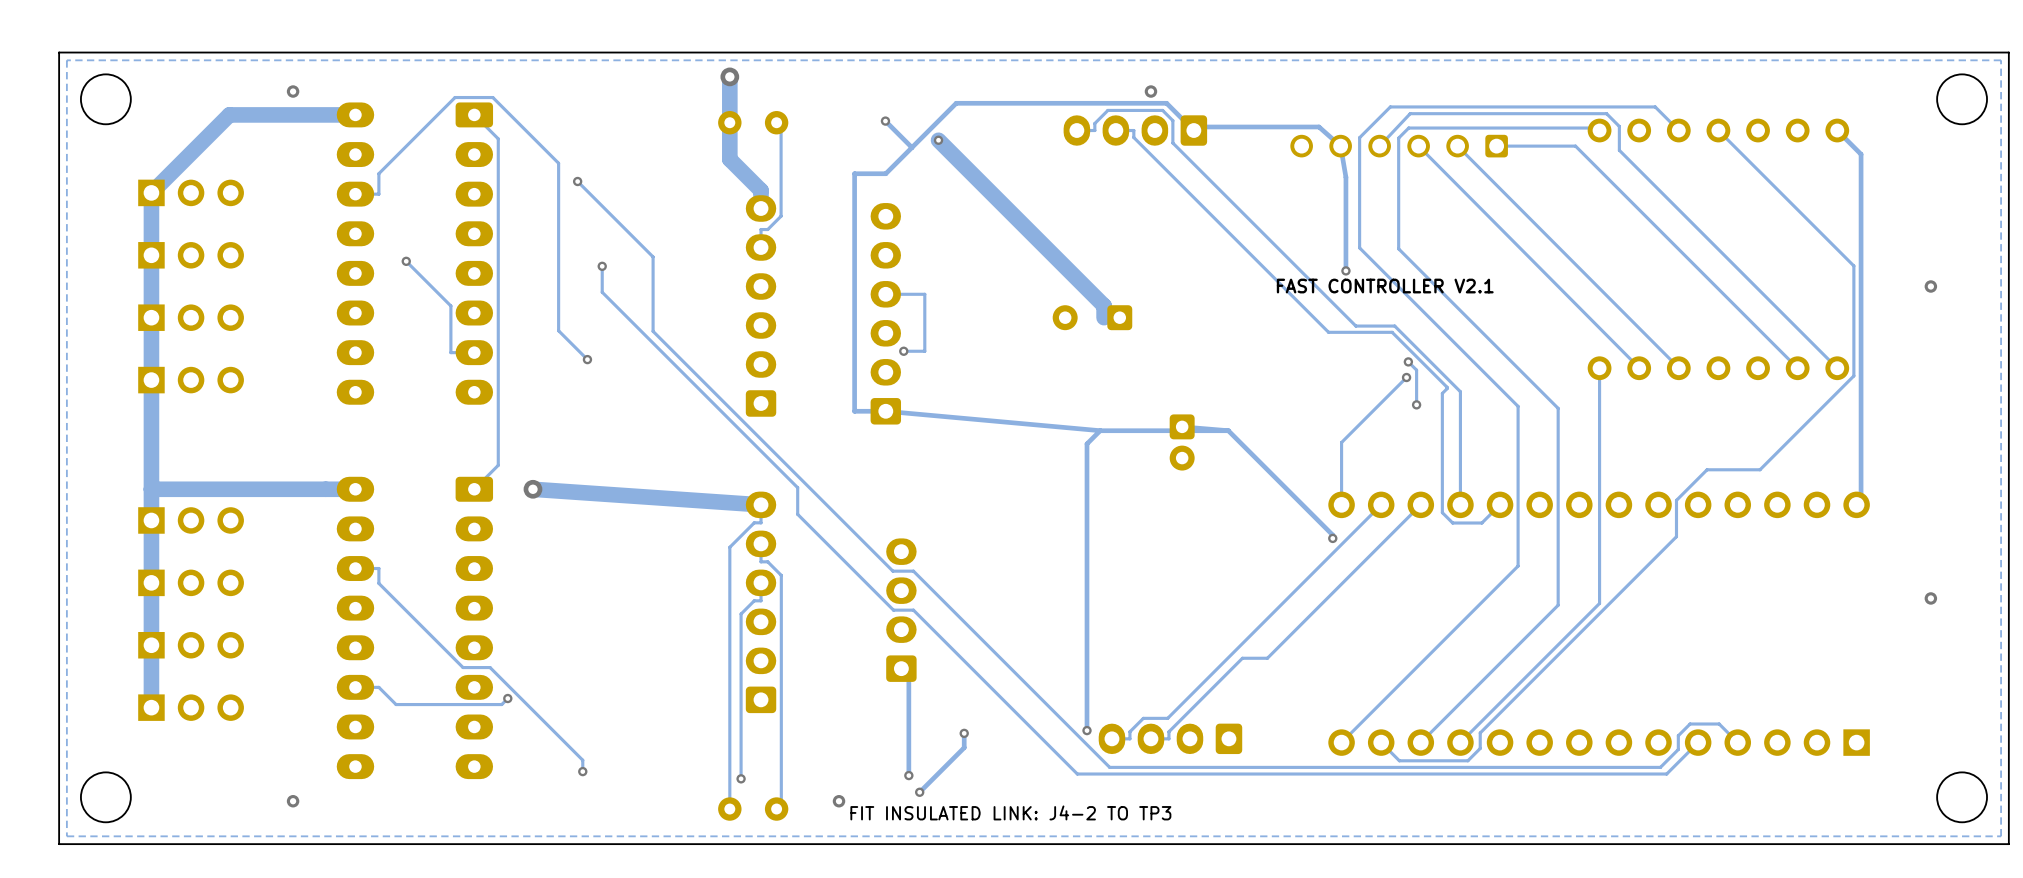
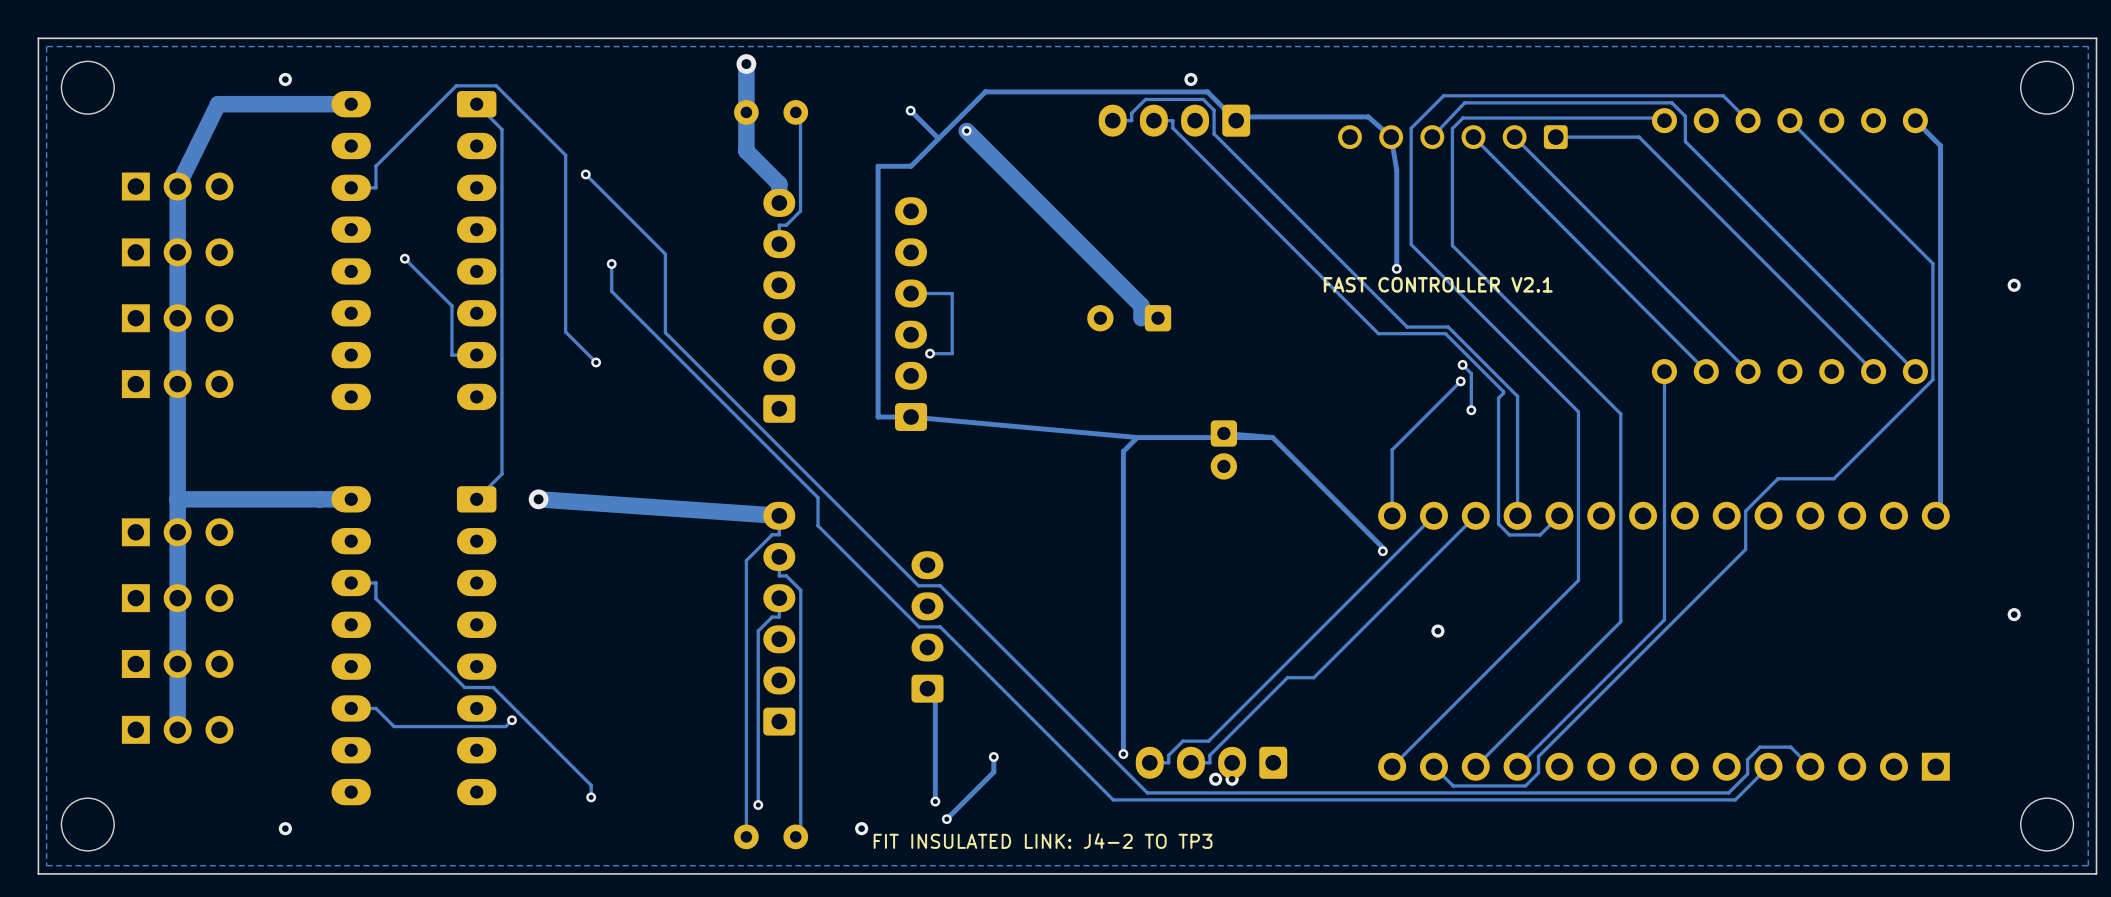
track: (229, 114) (151, 192) (151, 707) -> (218, 104) (177, 186) (177, 729)
track: (191, 489) (151, 489) -> none
via: none -> (1437, 631)
via: none -> (1215, 779)
via: none -> (1232, 779)

